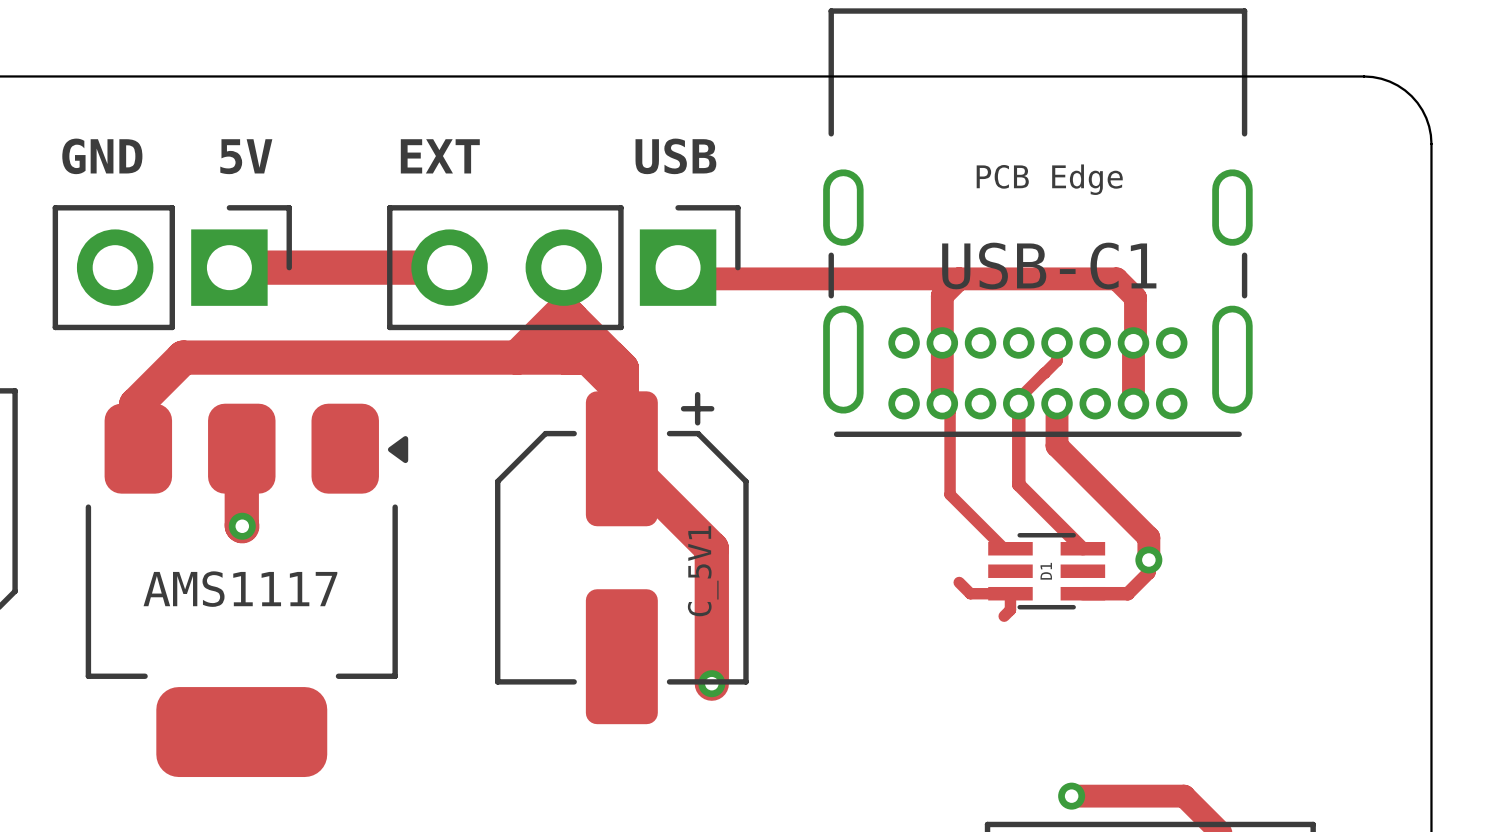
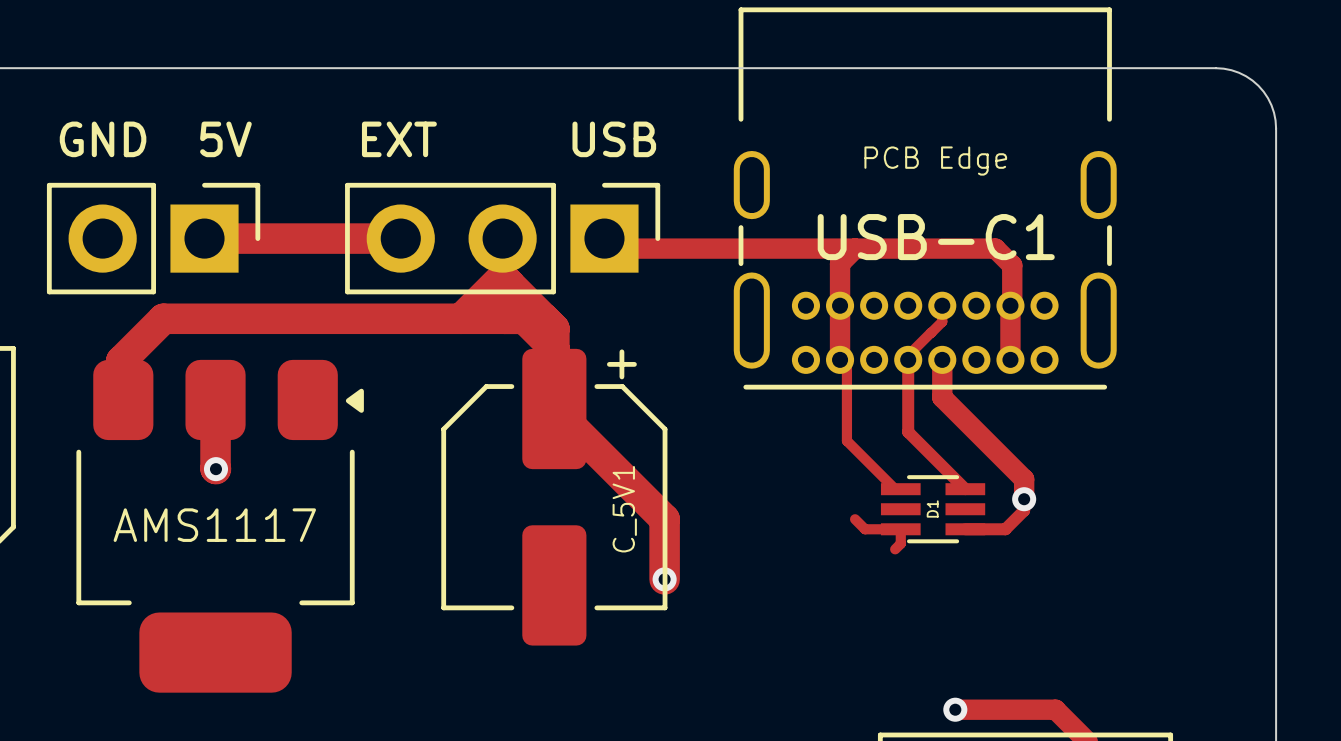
track: (711, 548) (711, 683) -> (634, 489) (664, 519) (664, 579)
via position: (711, 683) -> (664, 579)

